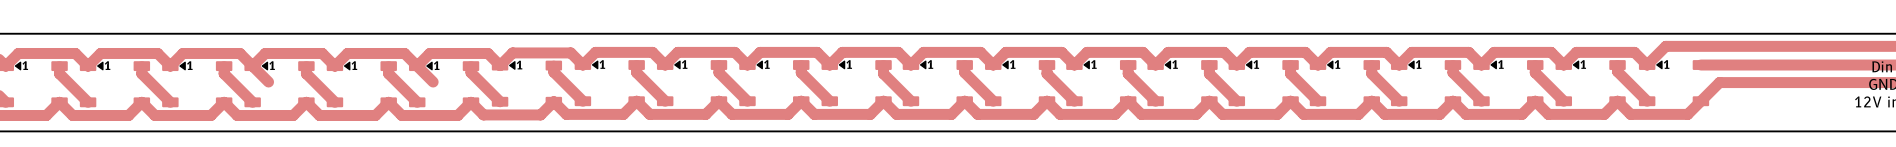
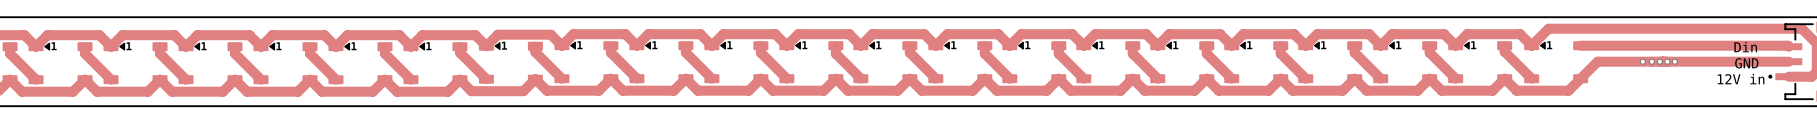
track: (252, 66) (268, 82) -> none
track: (417, 66) (433, 82) -> none
via: none -> (1642, 61)
via: none -> (1651, 61)
via: none -> (1659, 61)
via: none -> (1667, 61)
via: none -> (1674, 61)

